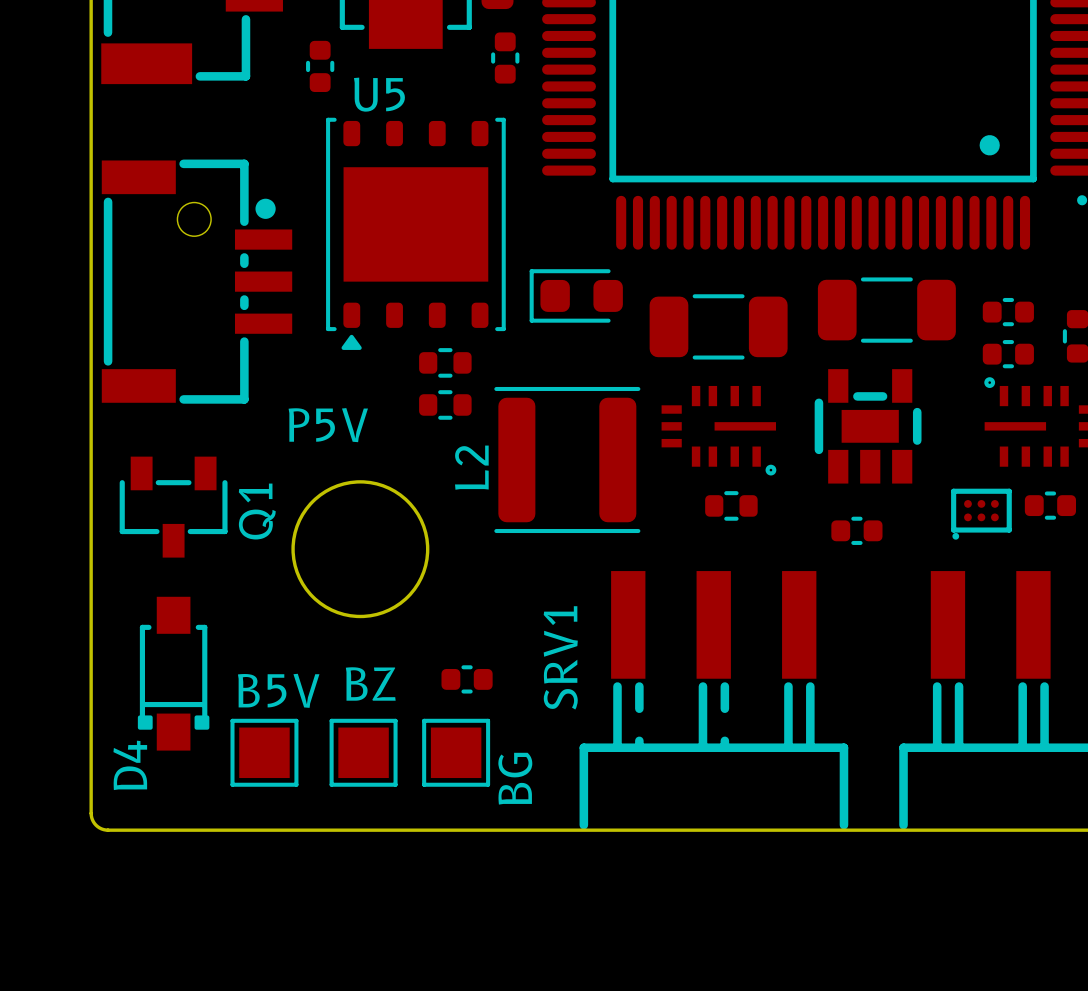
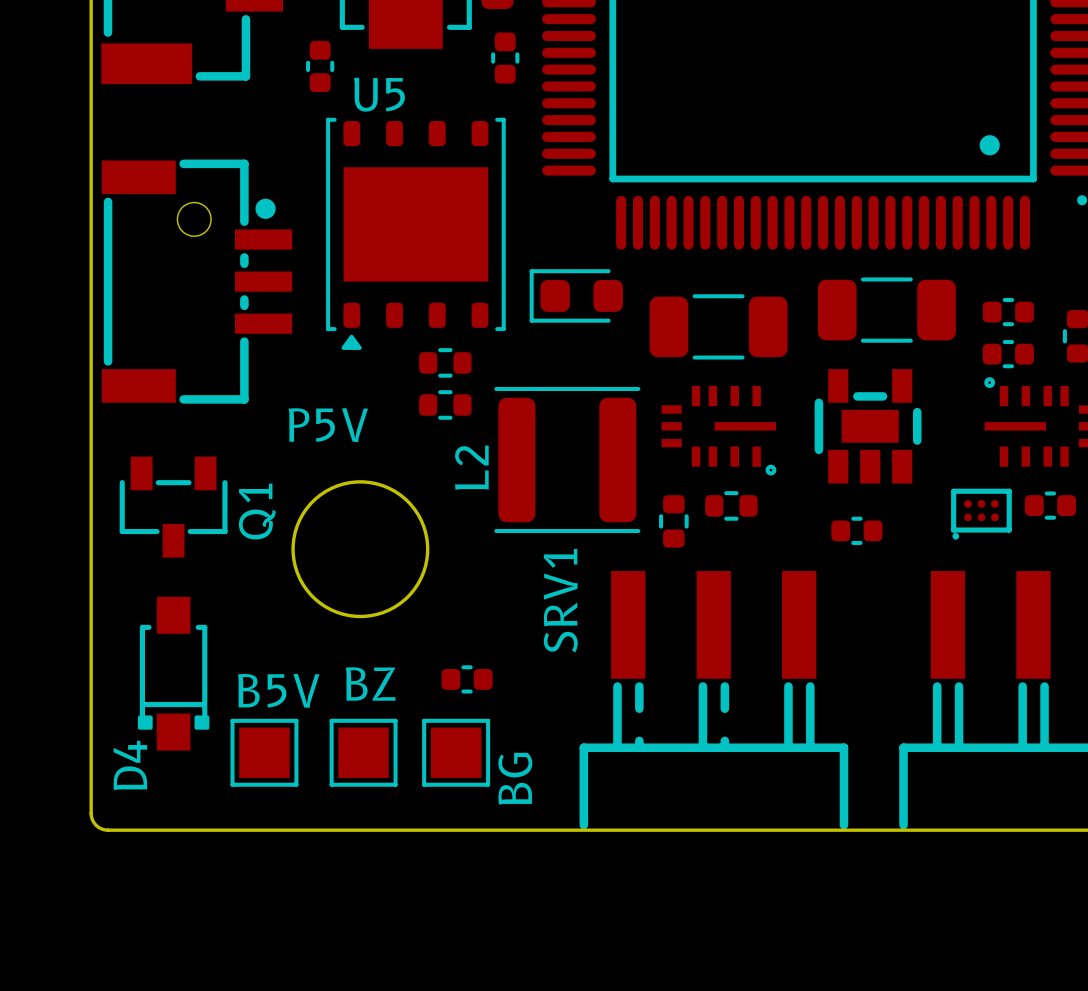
part: none -> (673, 521)
text position: SRV1 (560, 657) -> SRV1 (560, 600)

